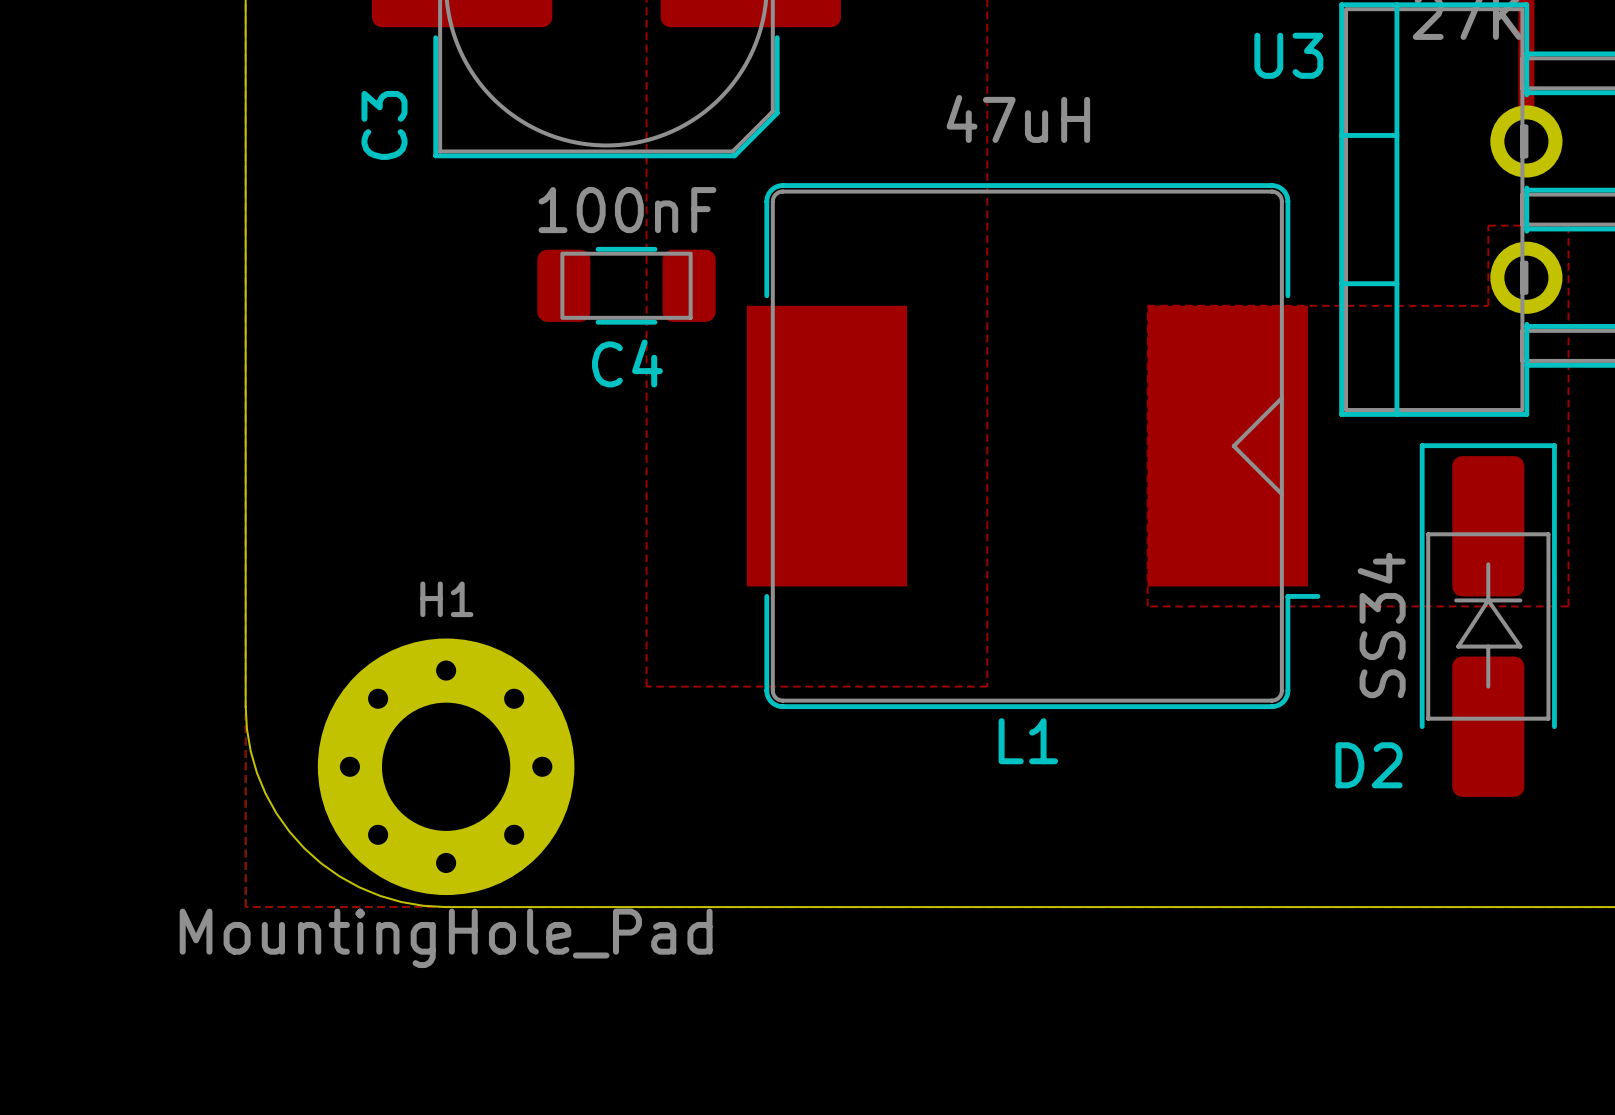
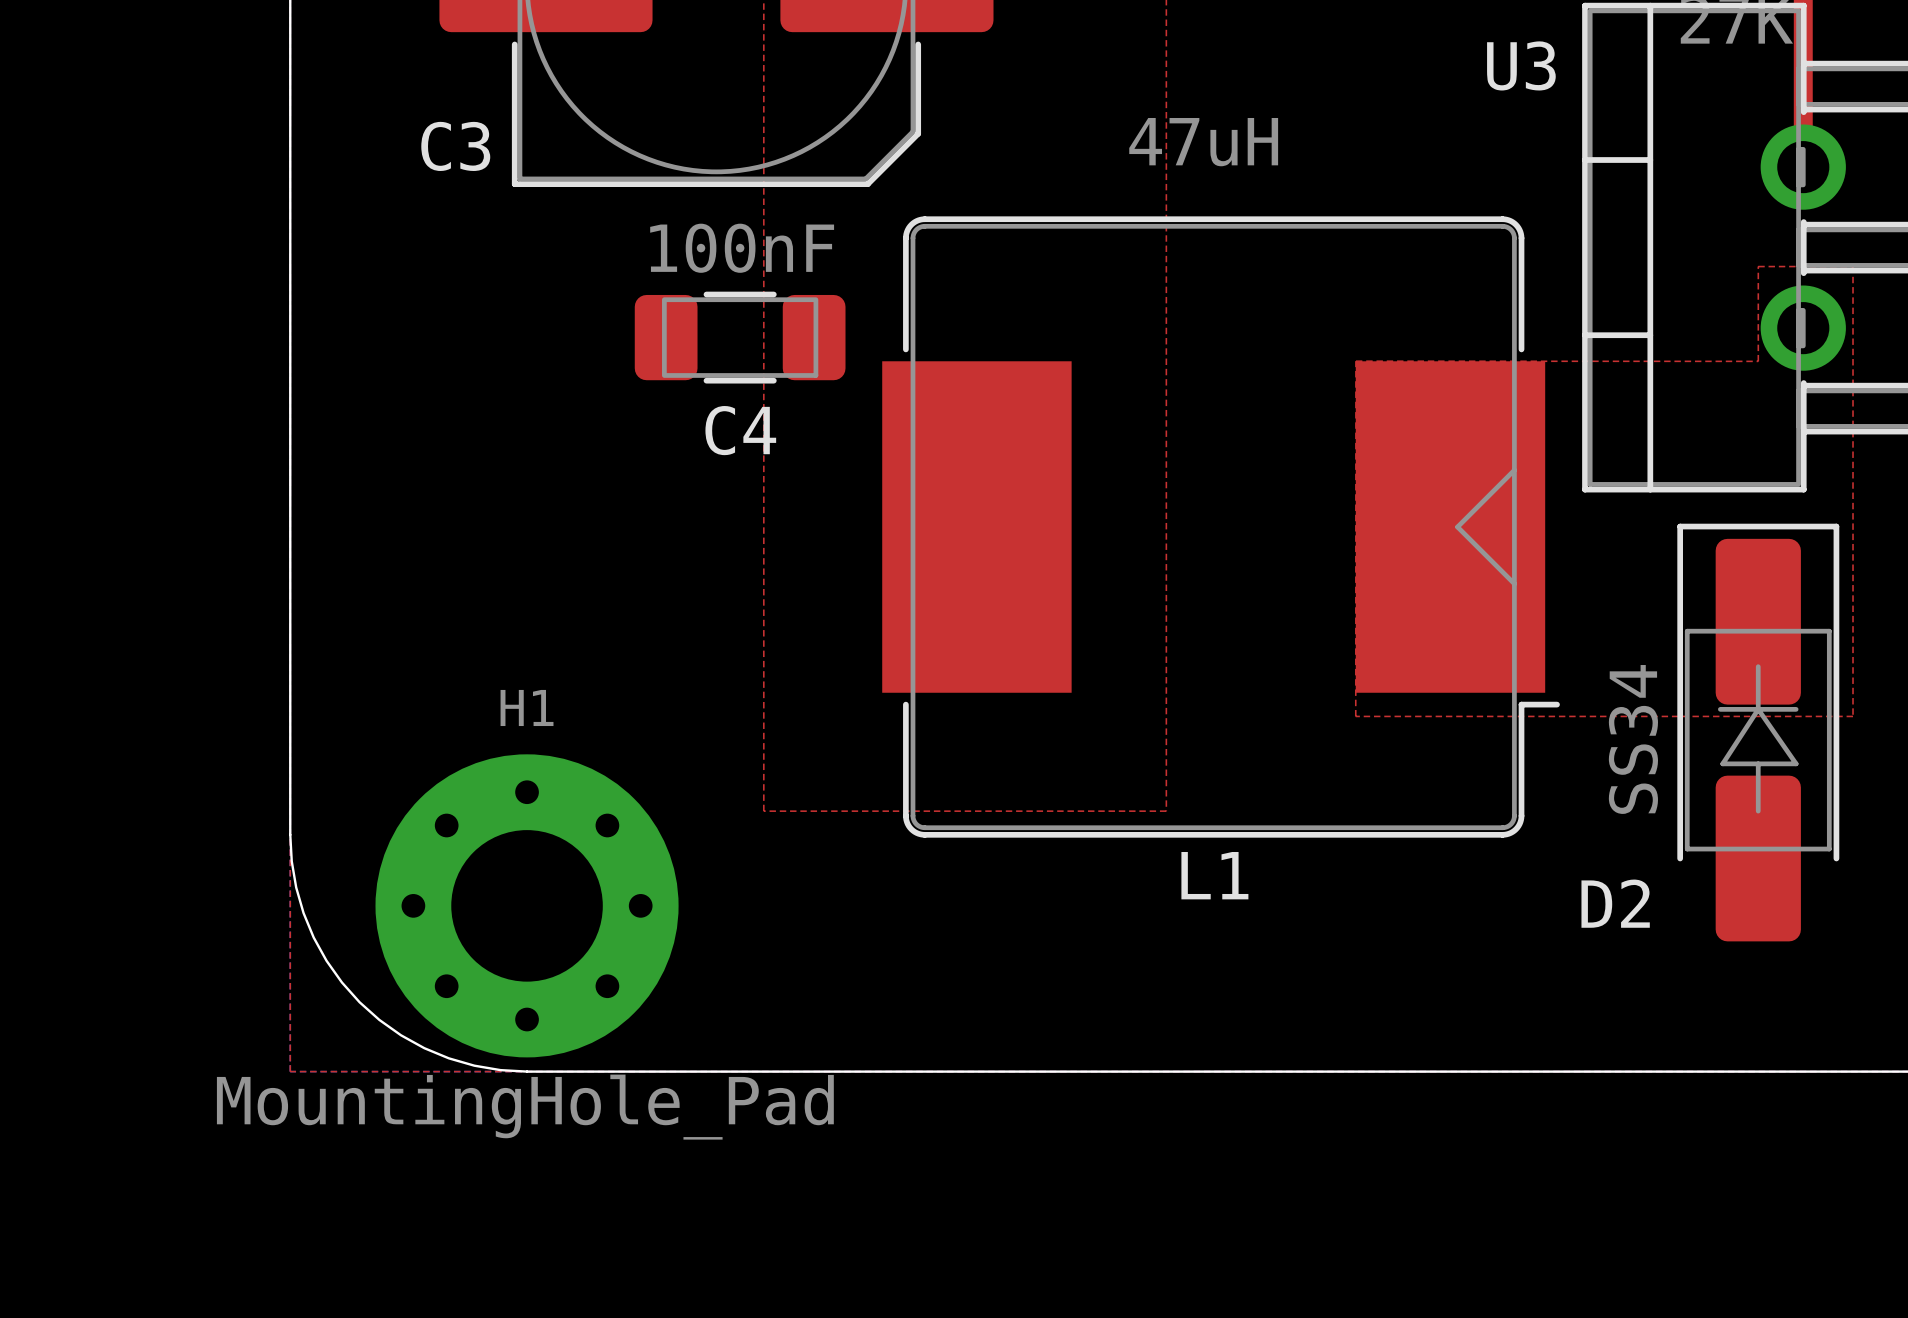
C3 name rotation: 0° (384, 125) -> 90° clockwise (455, 146)

